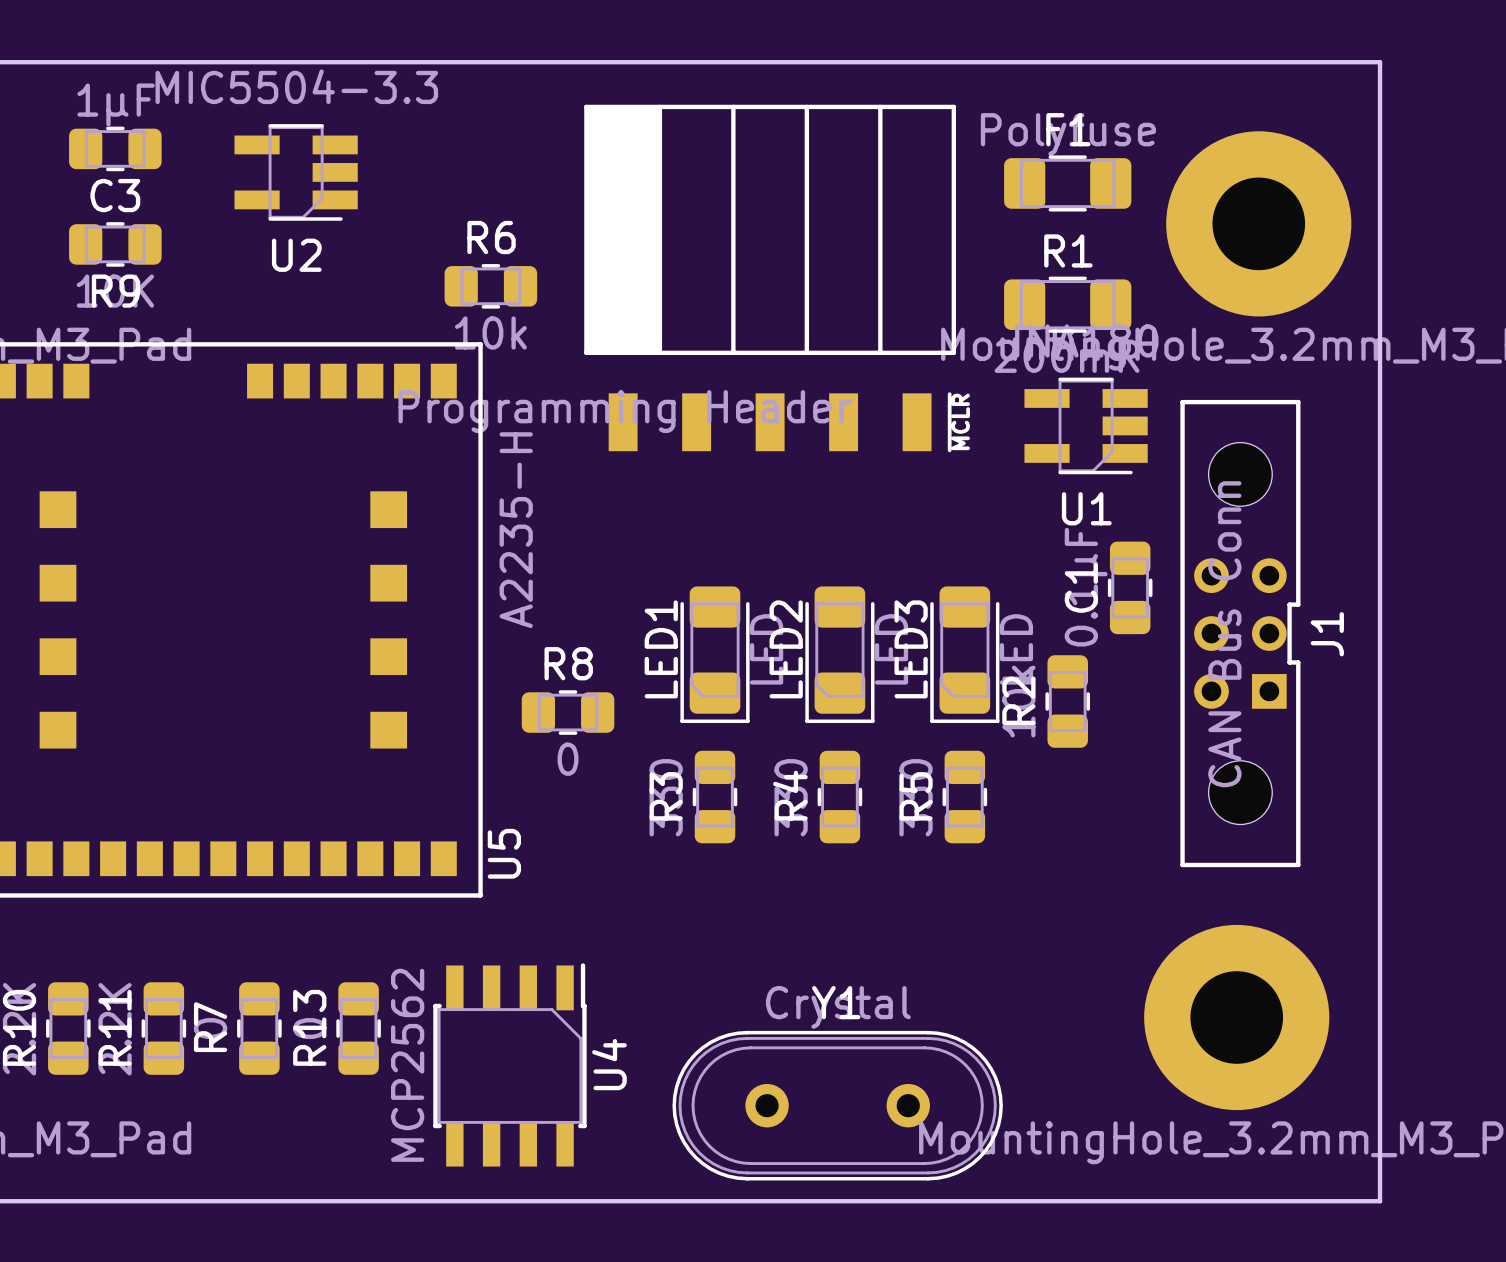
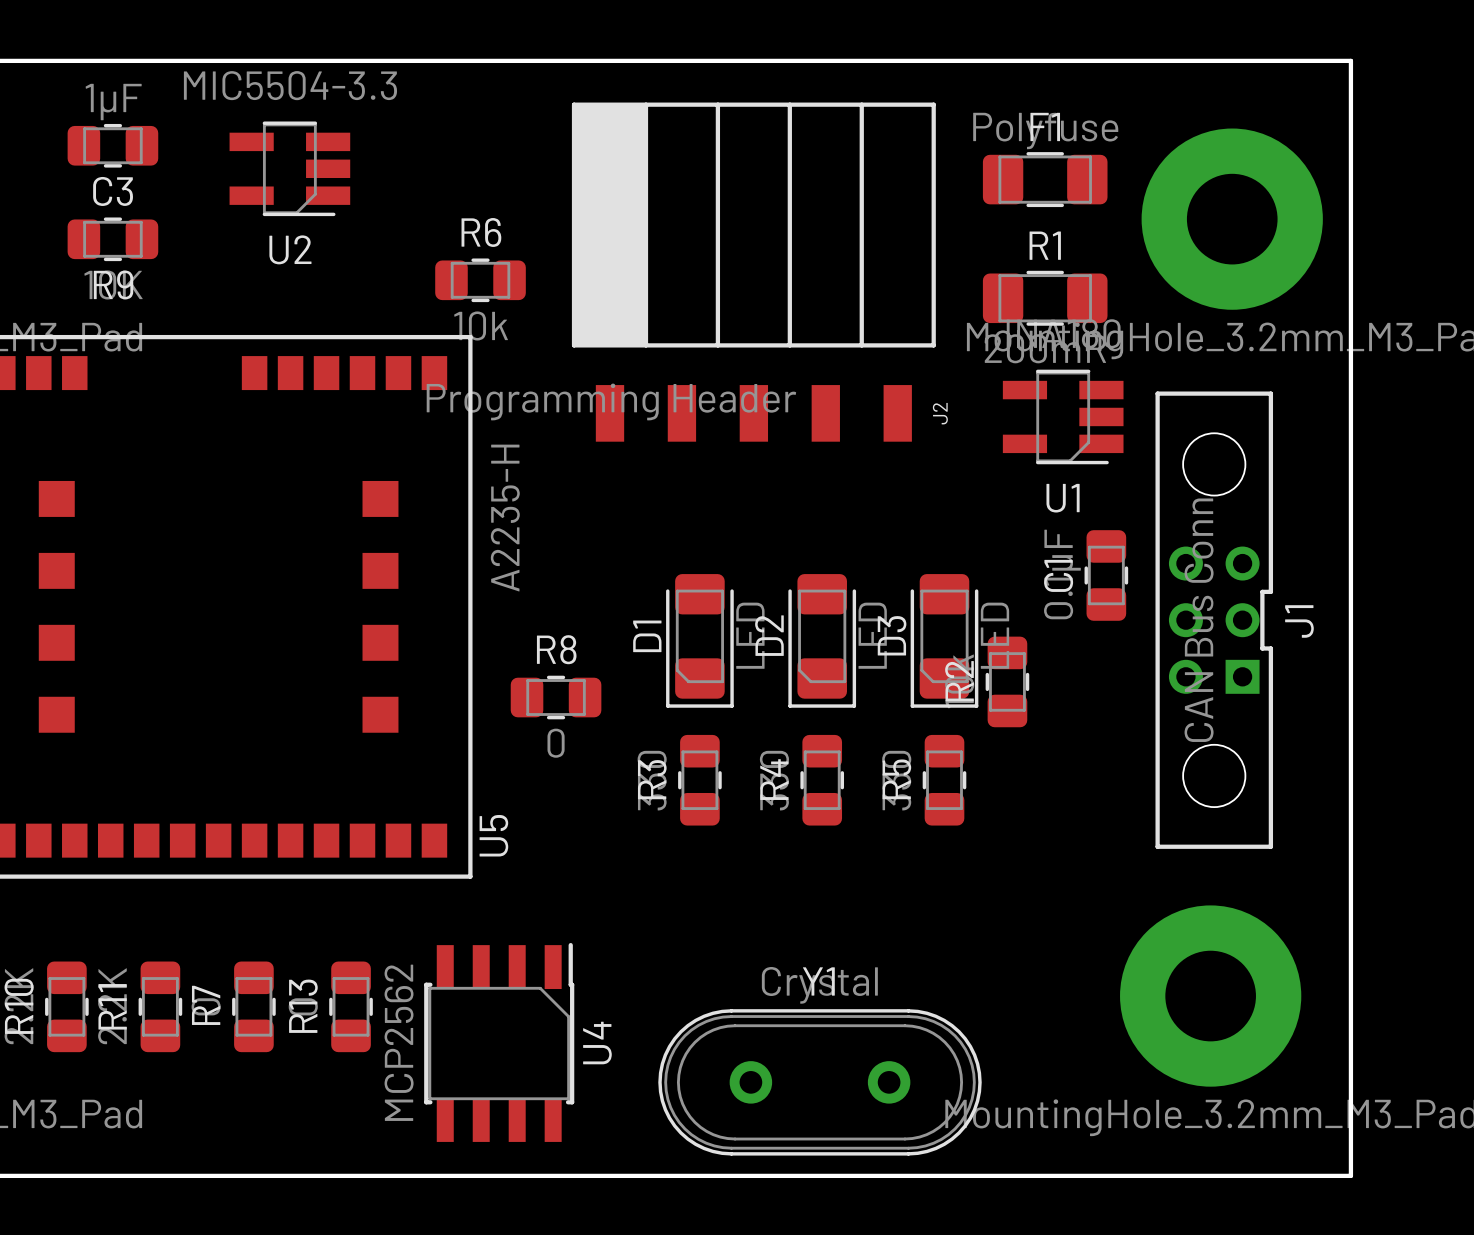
~{MCLR} name: ~{MCLR} (958, 422) -> J2 (940, 413)
LED1 name: LED1 (661, 649) -> D1 (647, 636)
LED2 name: LED2 (786, 649) -> D2 (769, 635)
LED3 name: LED3 (911, 649) -> D3 (892, 635)
R2 position: (1067, 701) -> (1007, 681)

